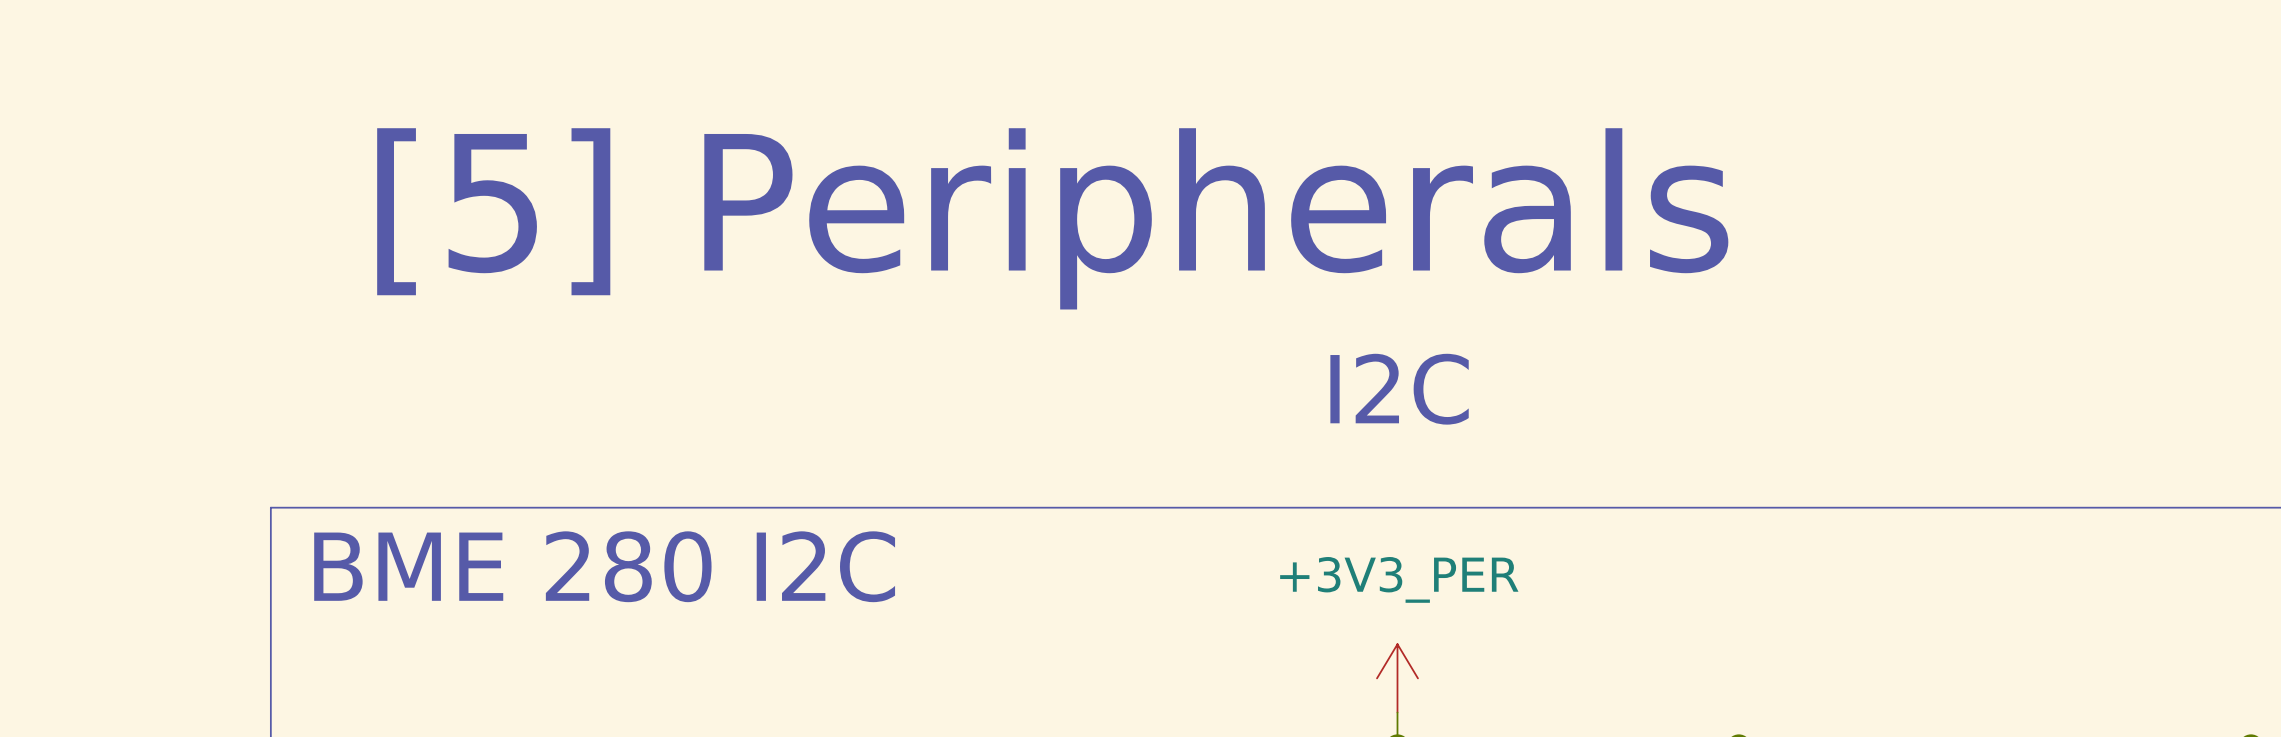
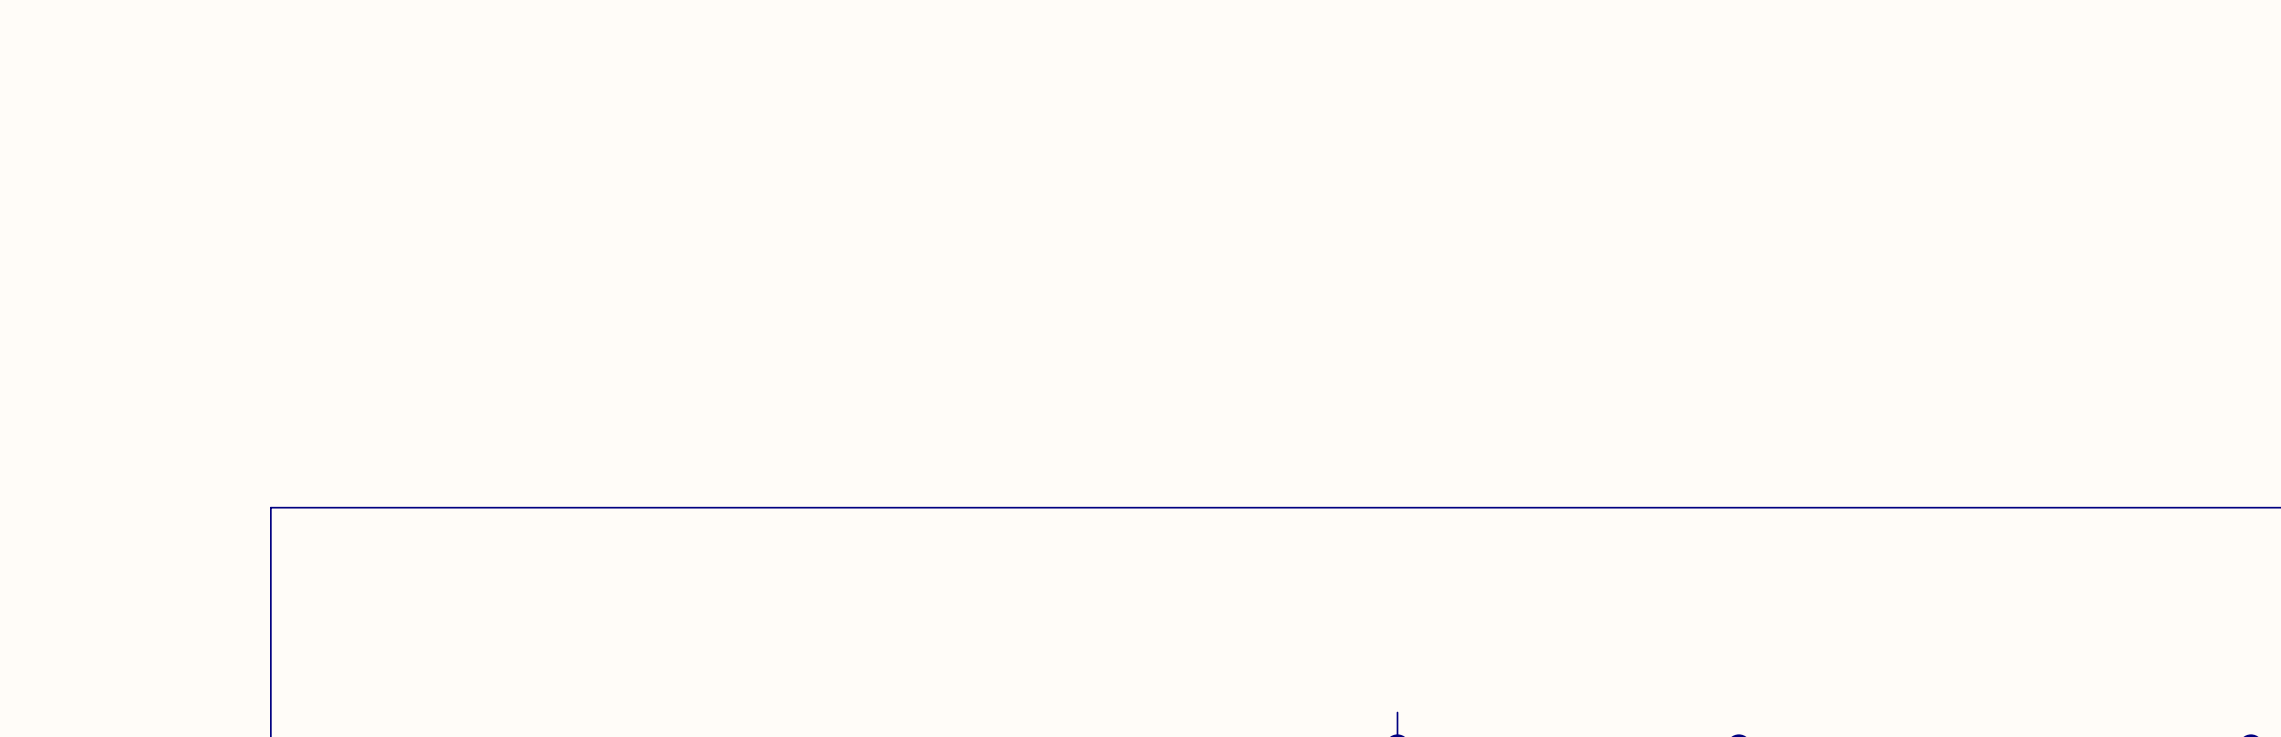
text: [5] Peripherals (1052, 218) -> none
text: I2C (1399, 389) -> none
text: BME 280 I2C (604, 566) -> none
power symbol: +3V3_PER (1397, 678) -> none

